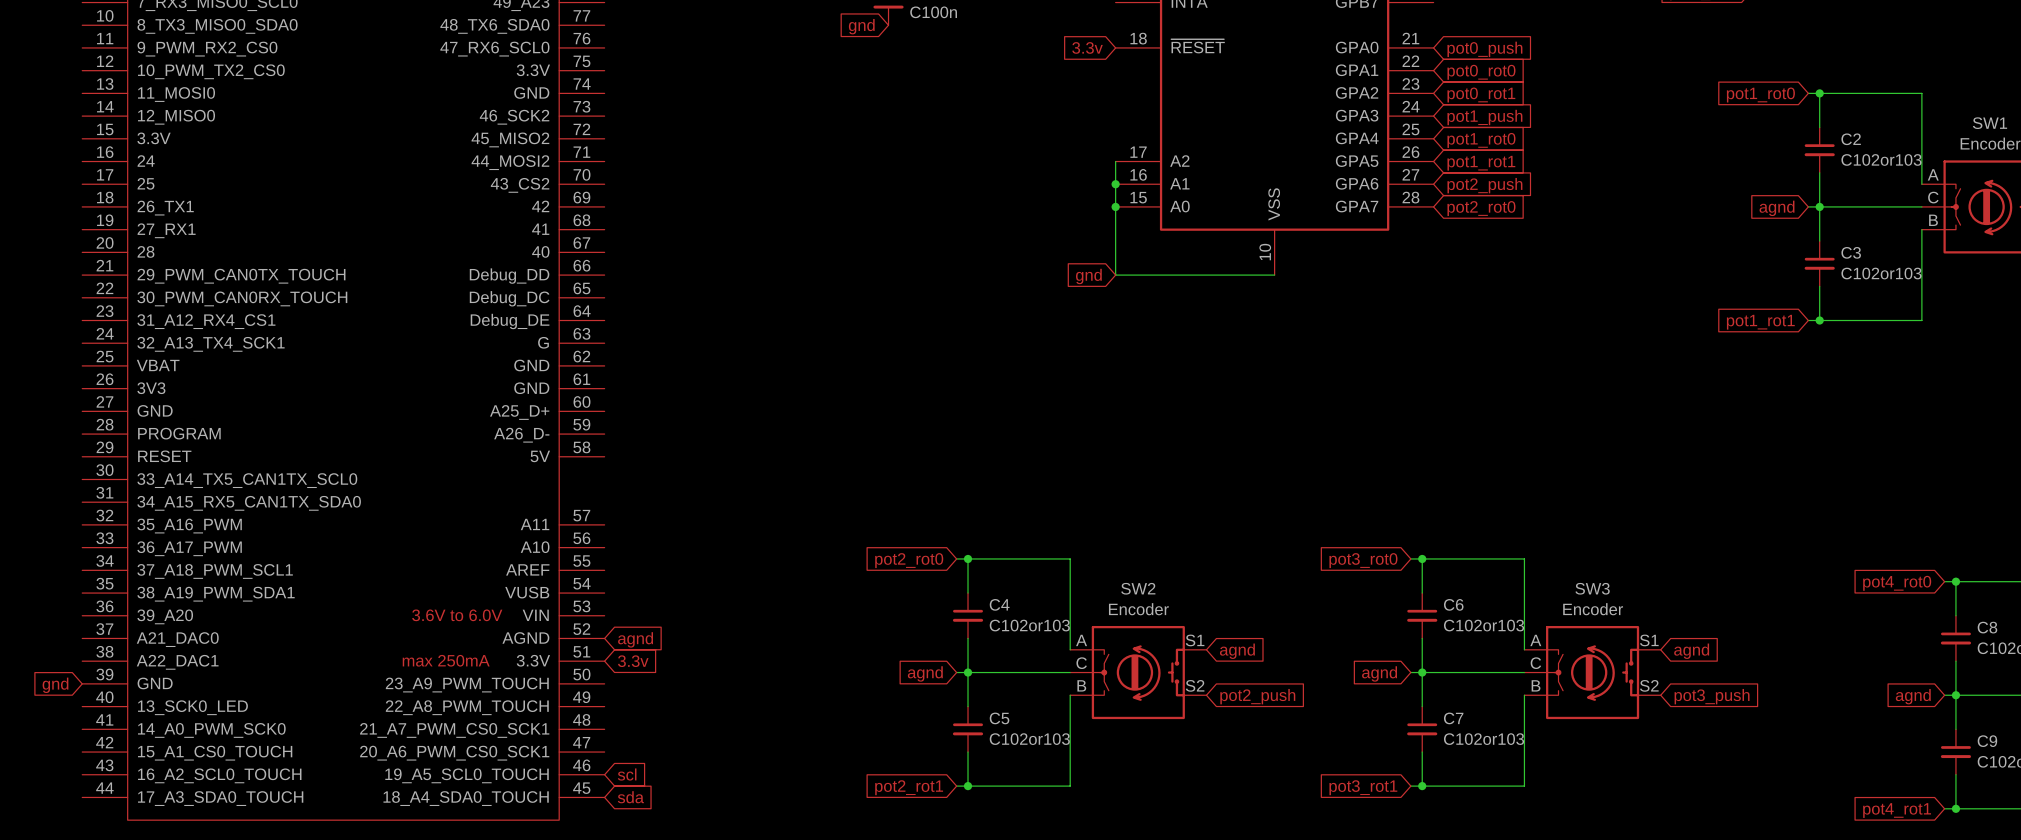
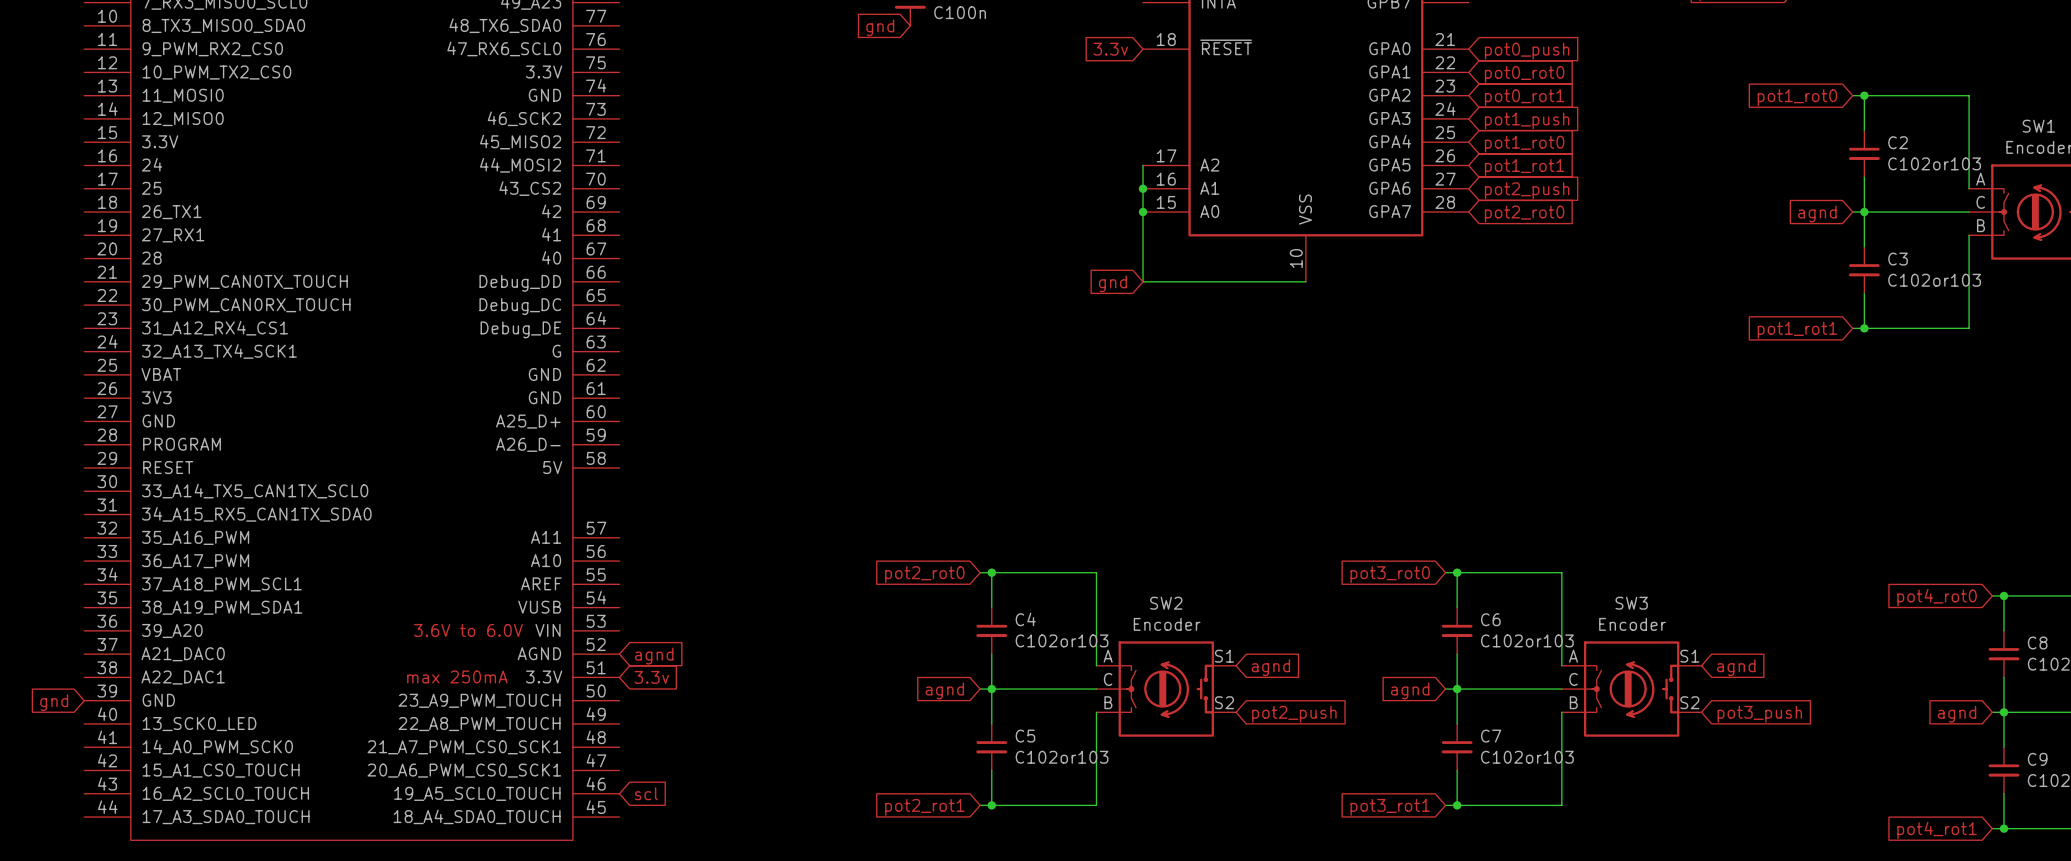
global label: sda (630, 797) -> none

